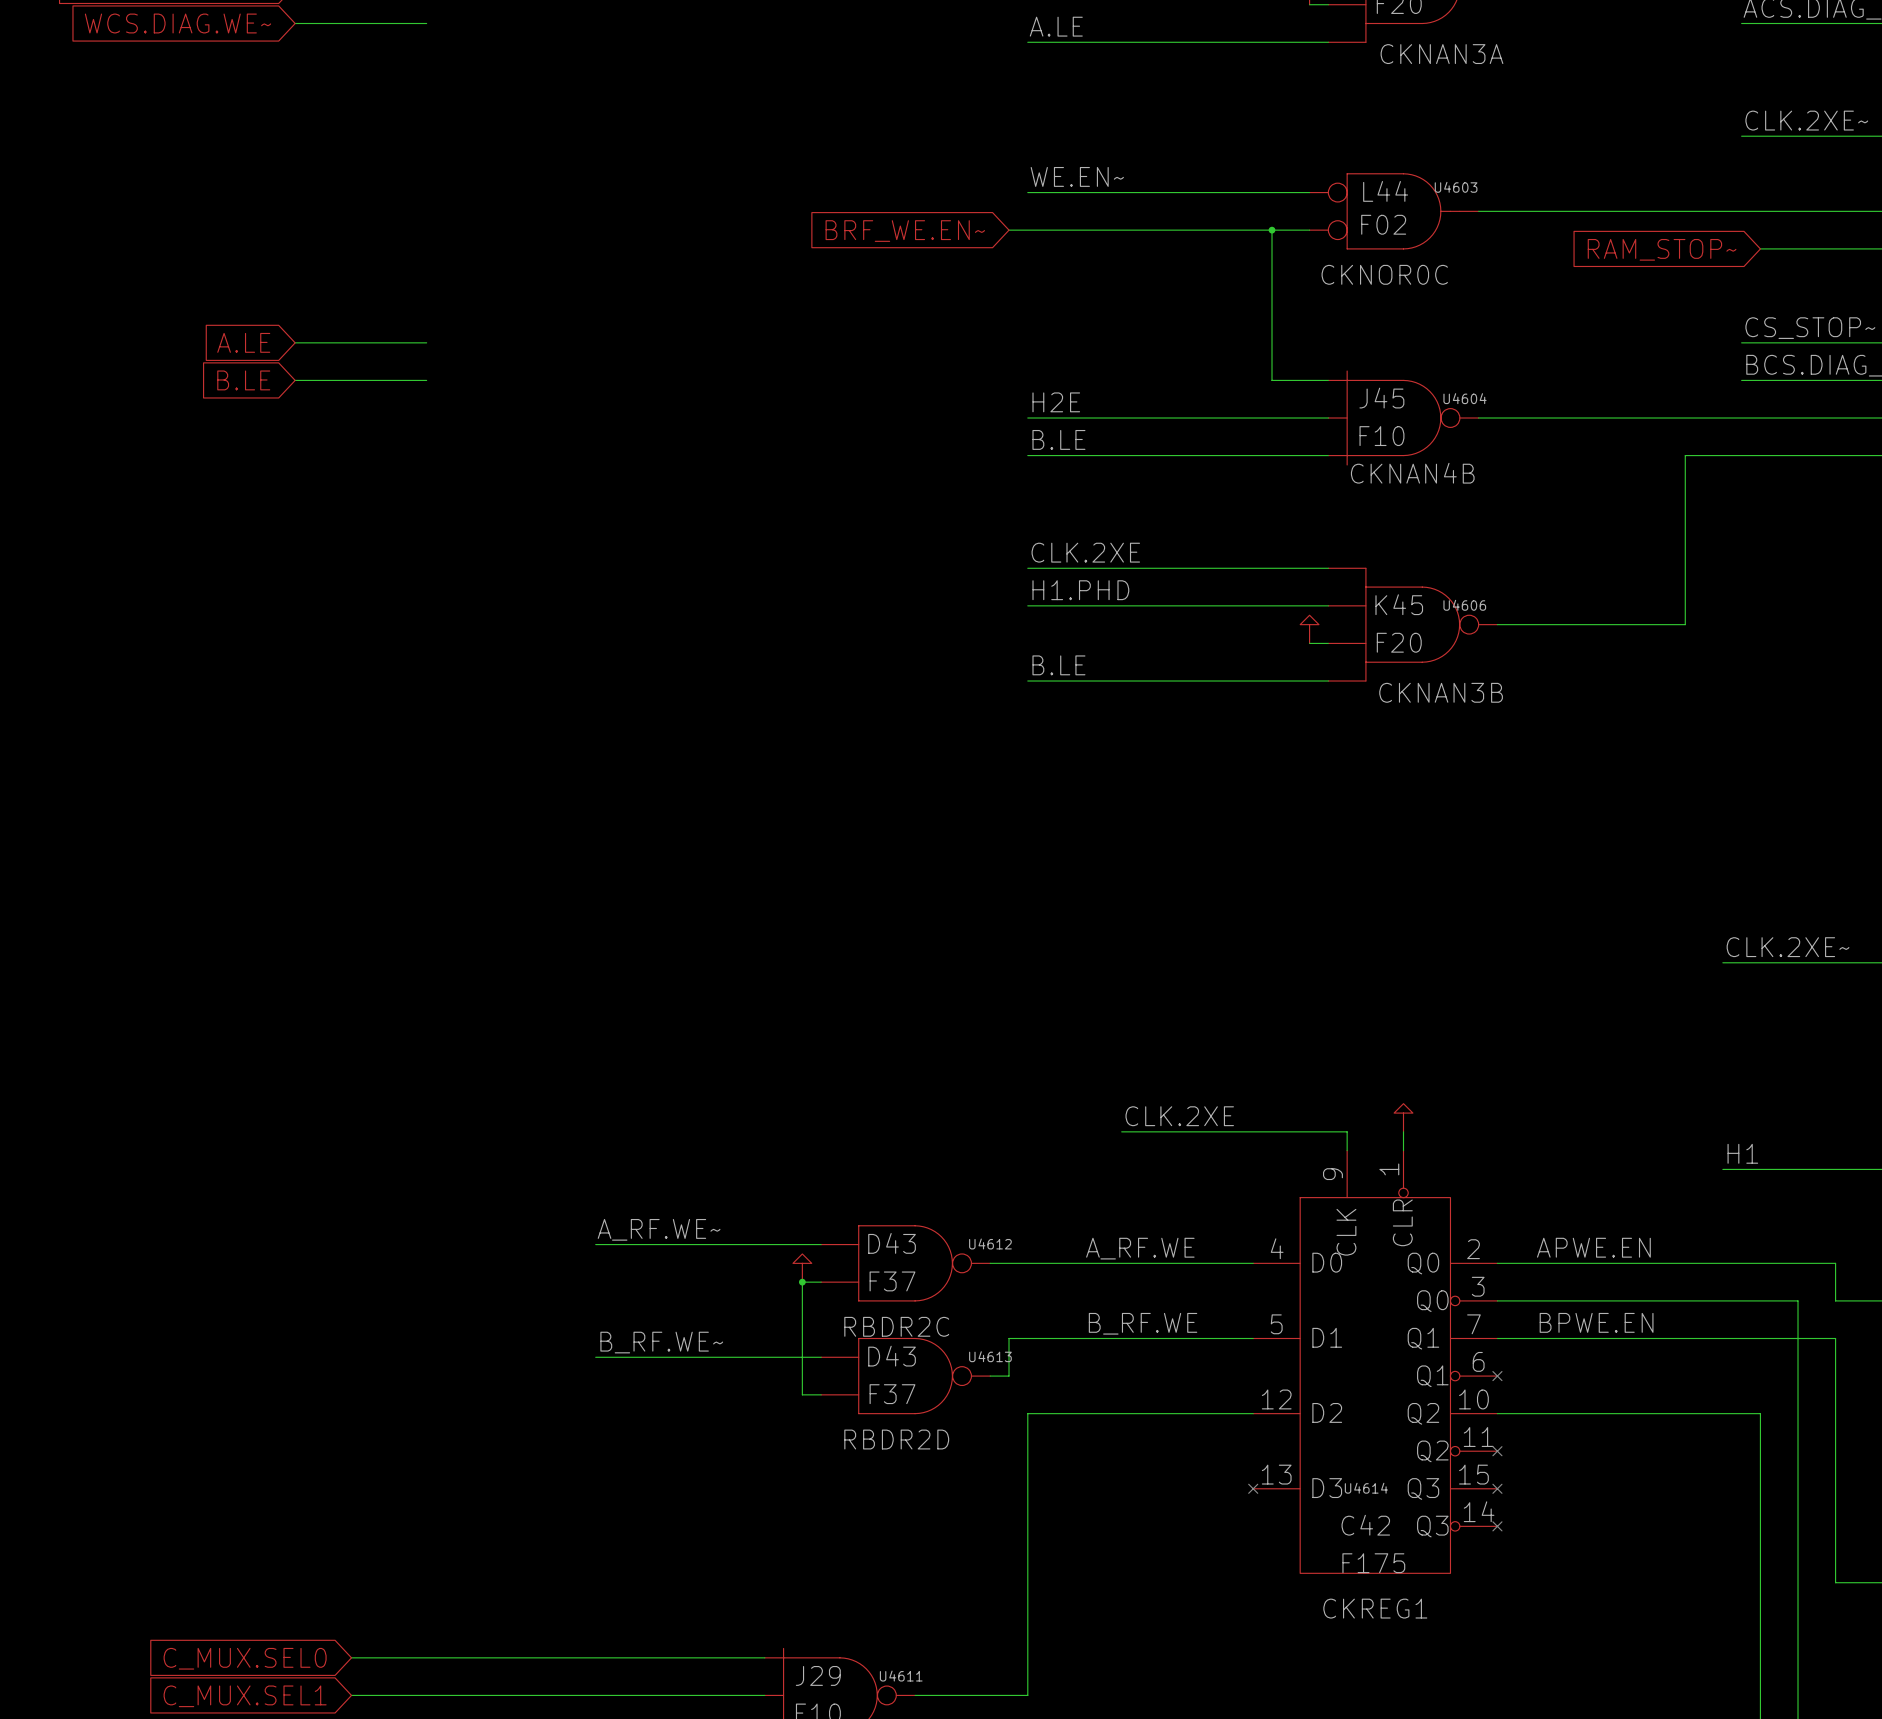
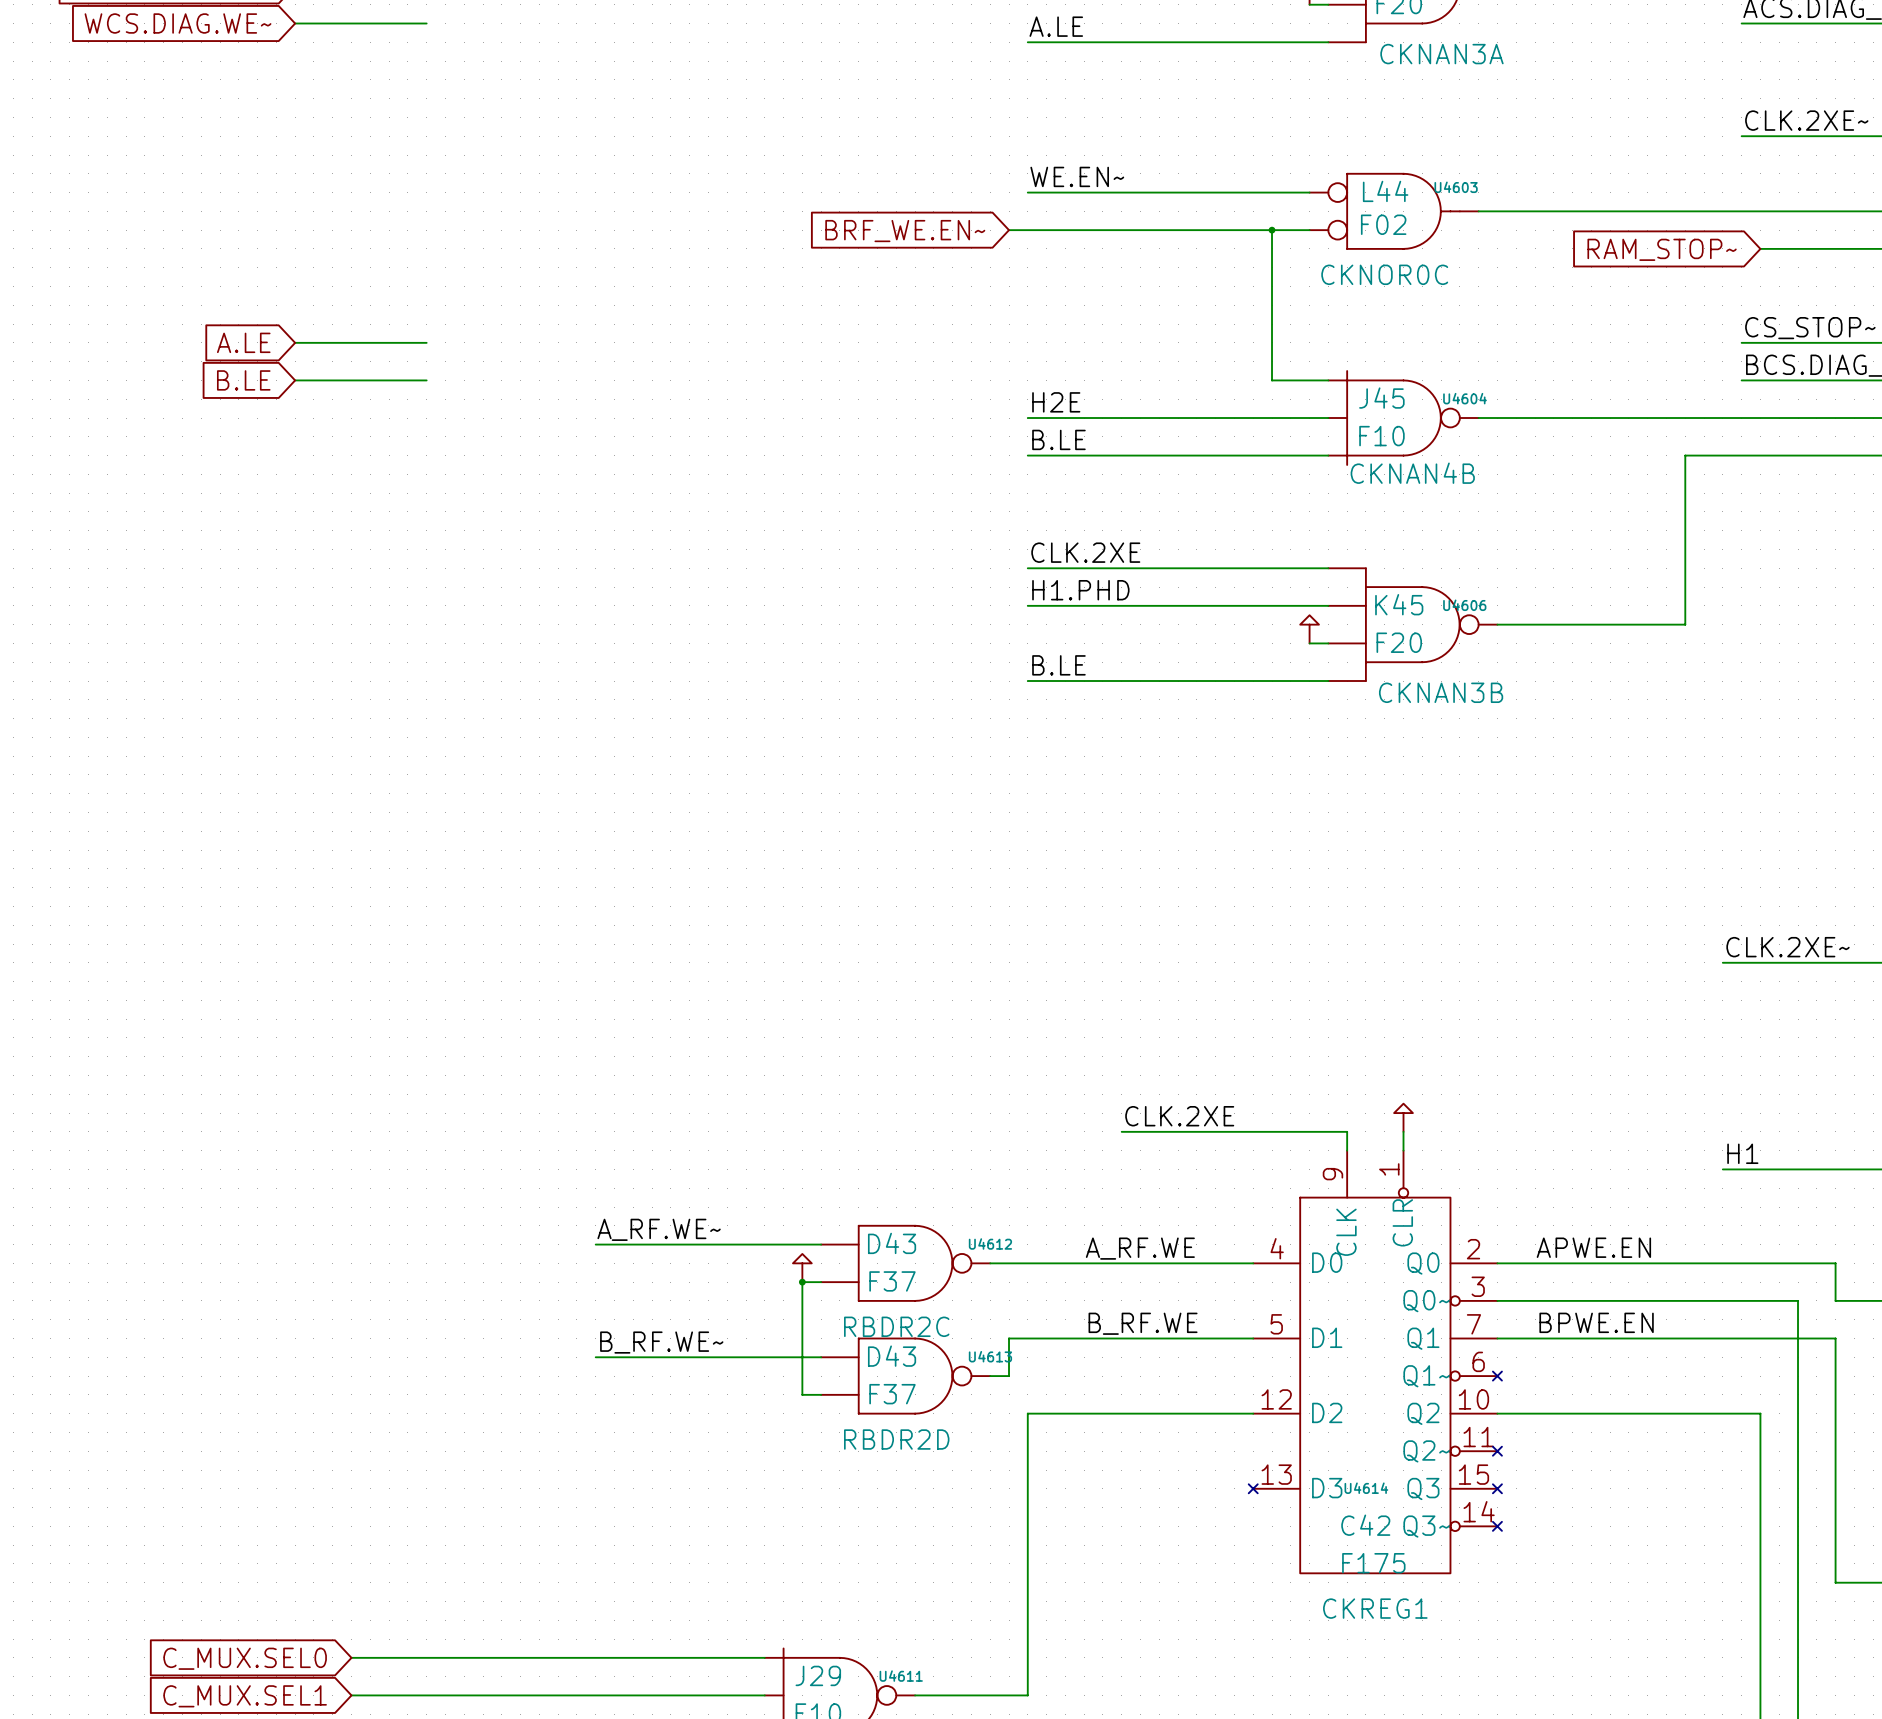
U4614 pin name: Q0 (1432, 1301) -> Q0~ (1426, 1301)
U4614 pin name: Q1 (1432, 1376) -> Q1~ (1426, 1376)
U4614 pin name: Q2 (1432, 1451) -> Q2~ (1426, 1451)
U4614 pin name: Q3 (1432, 1526) -> Q3~ (1426, 1526)

